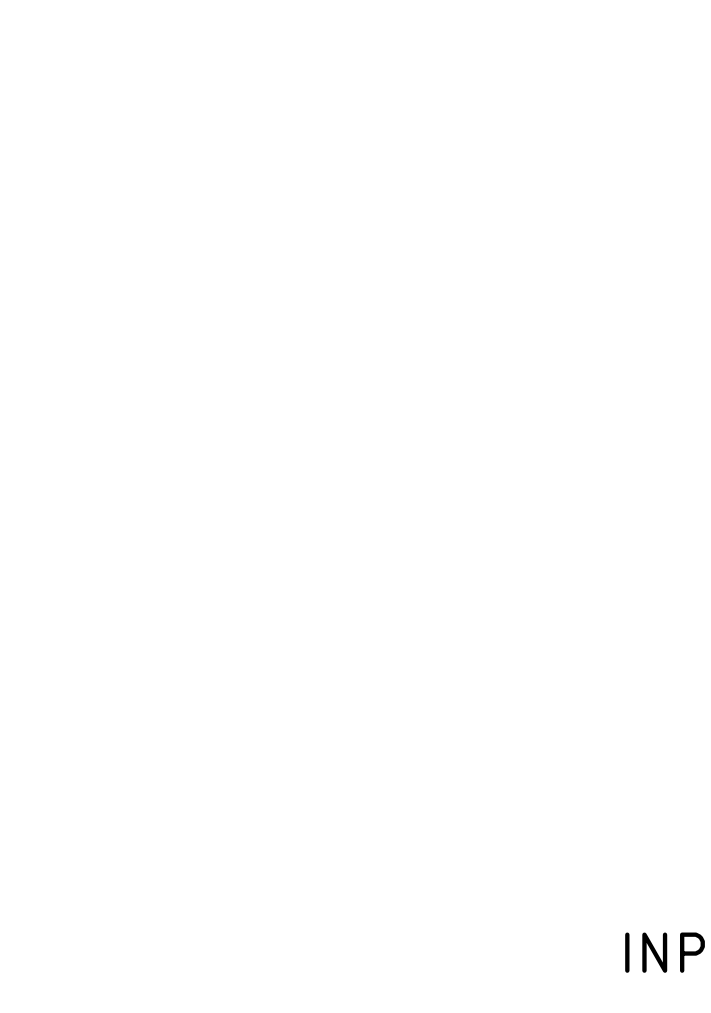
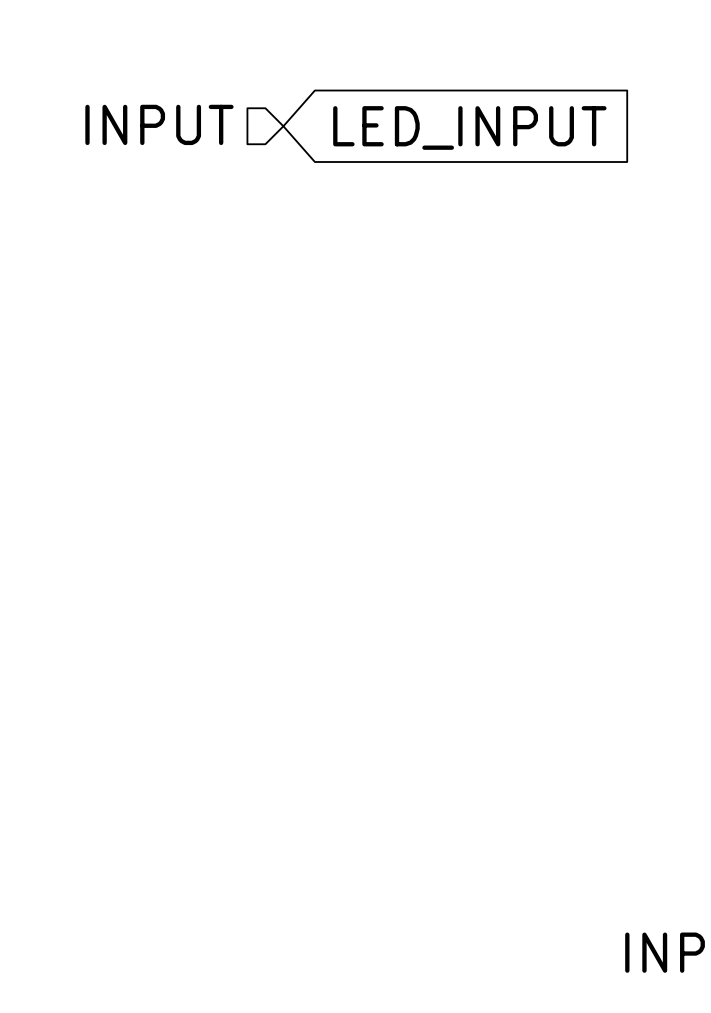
hierarchical label: none -> INPUT (159, 124)
global label: none -> LED_INPUT (469, 127)

